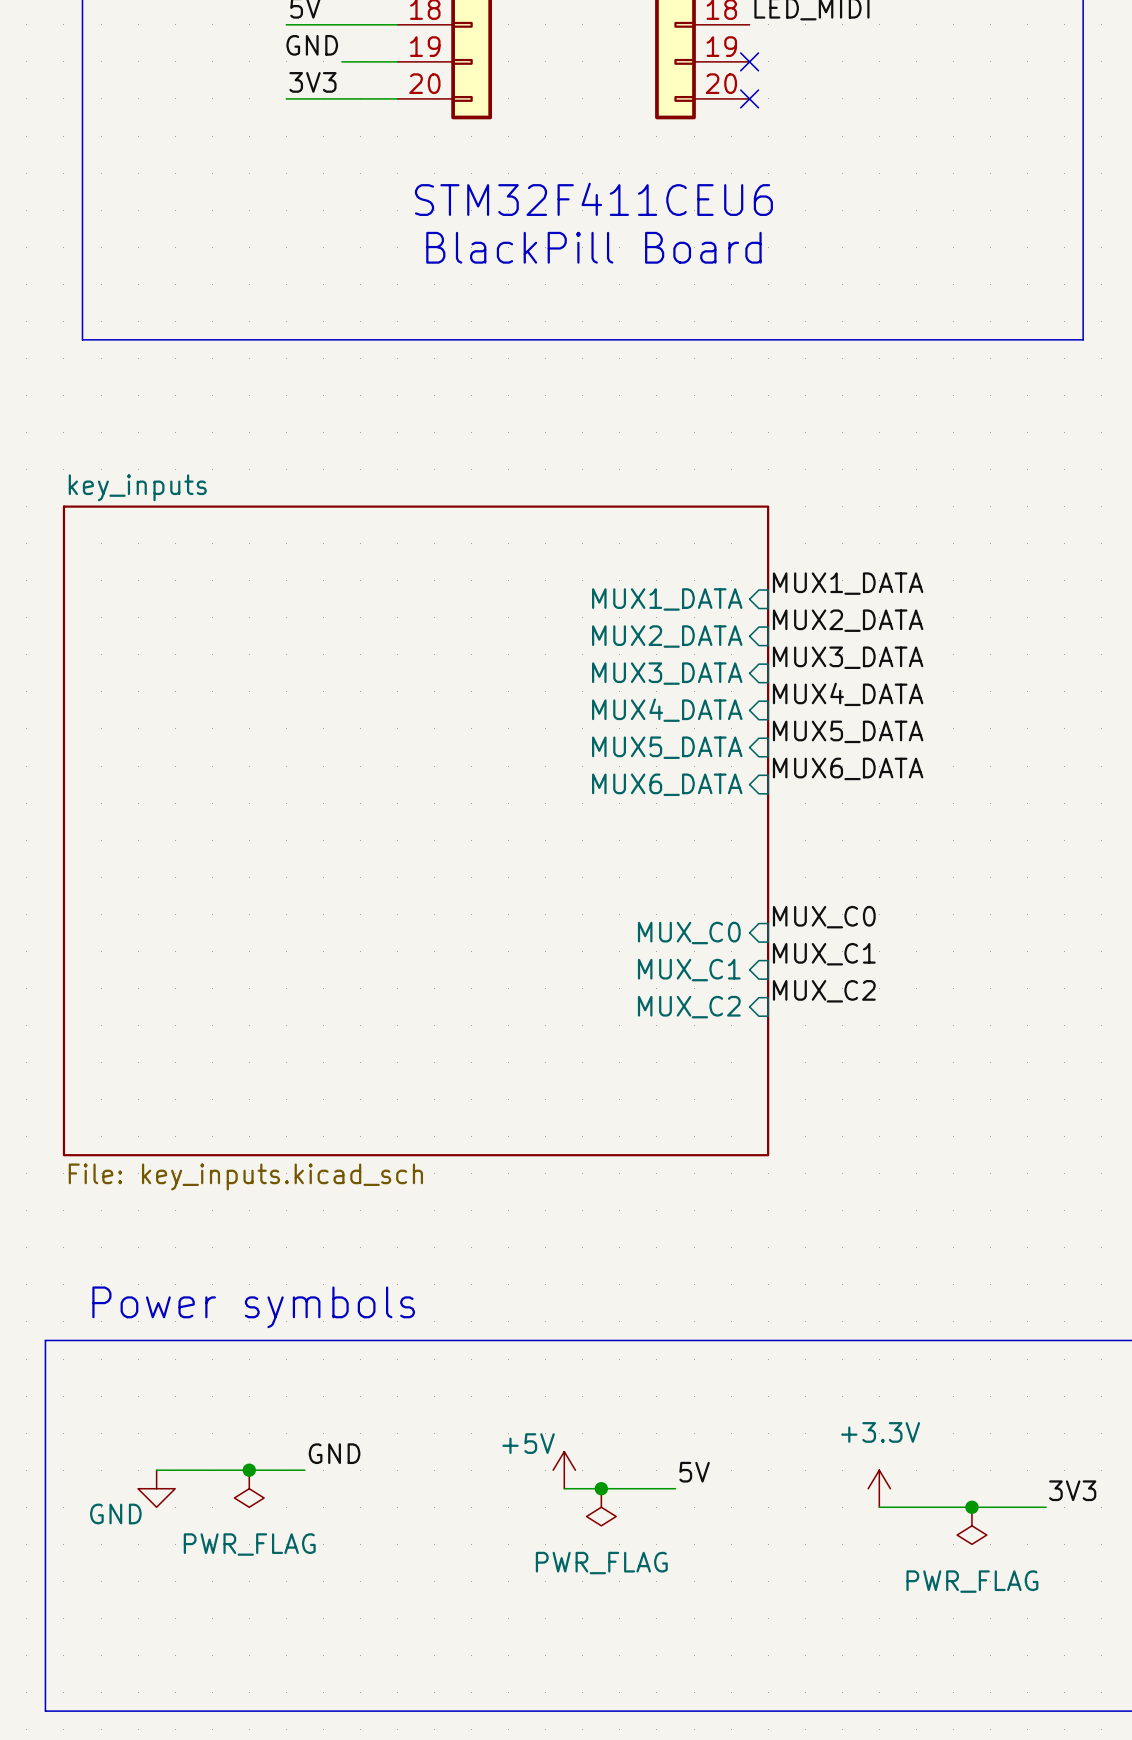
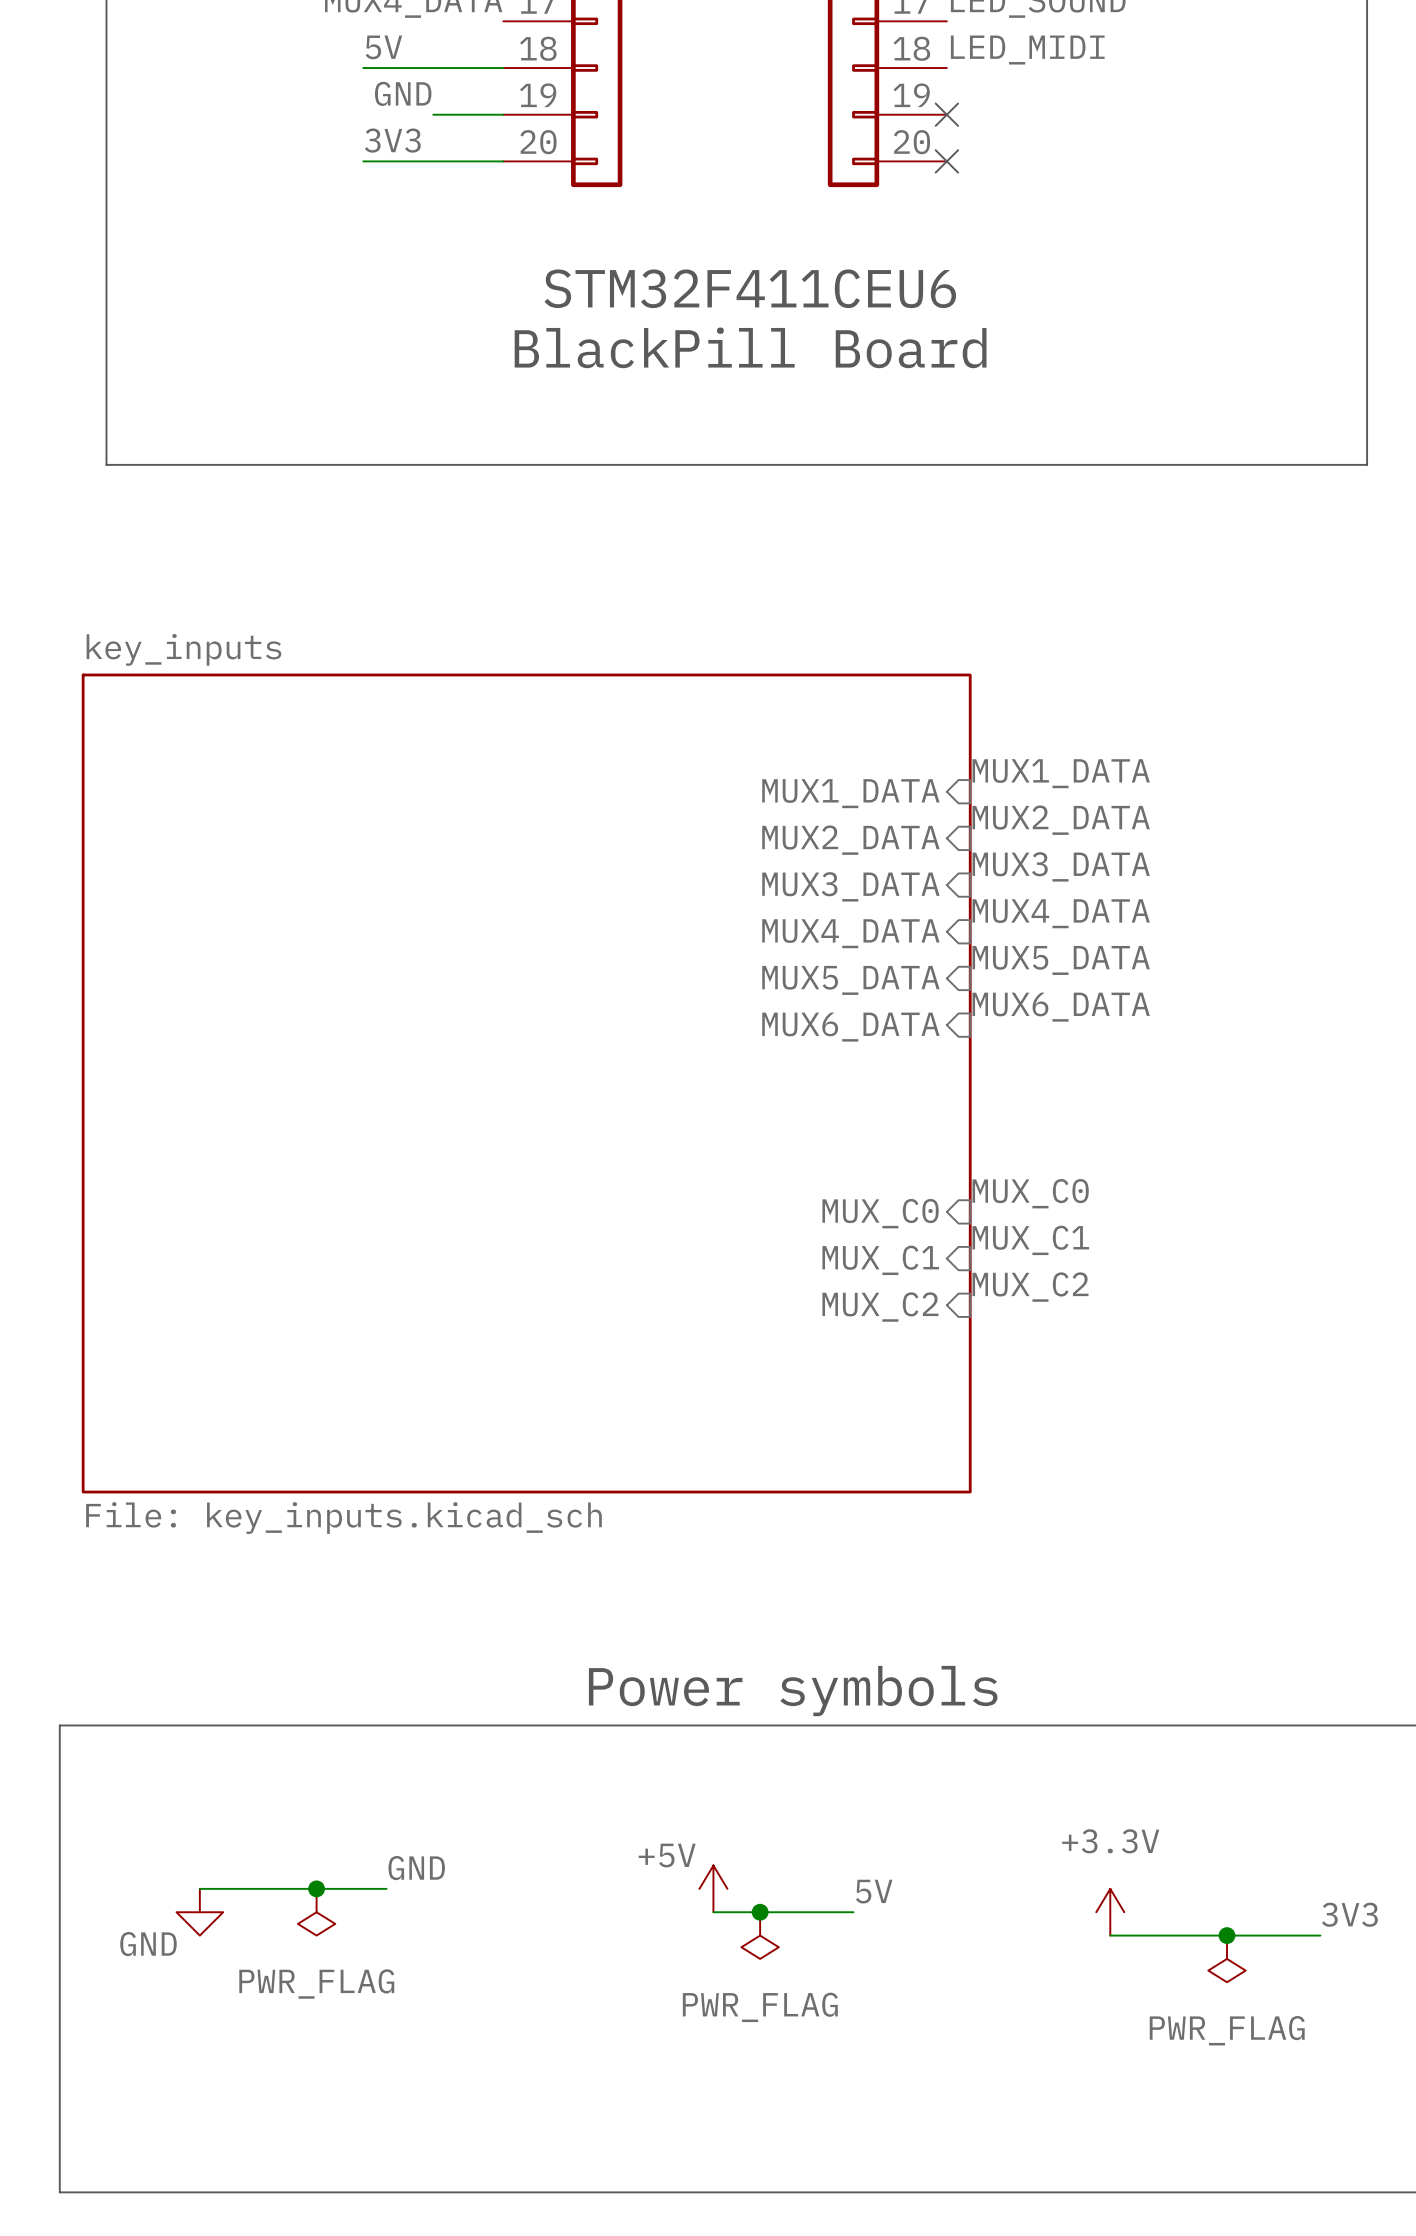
text: Power symbols (253, 1307) -> none
text: none -> Power symbols (793, 1691)

